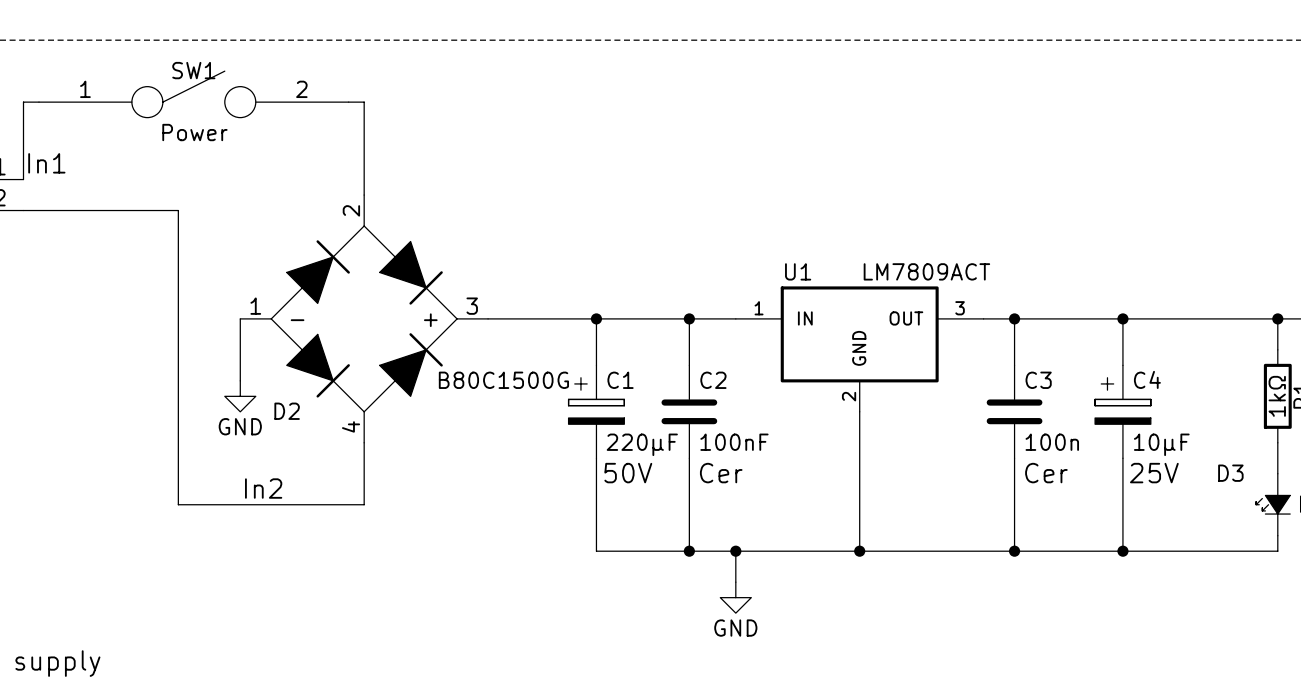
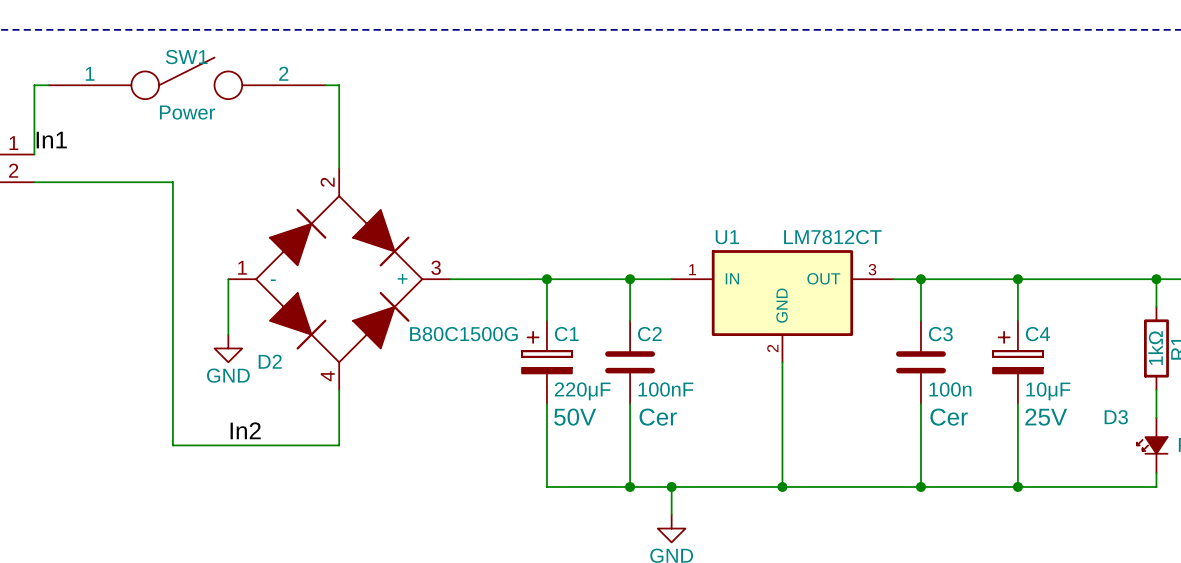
U1 value: LM7809ACT (926, 271) -> LM7812CT (832, 237)

